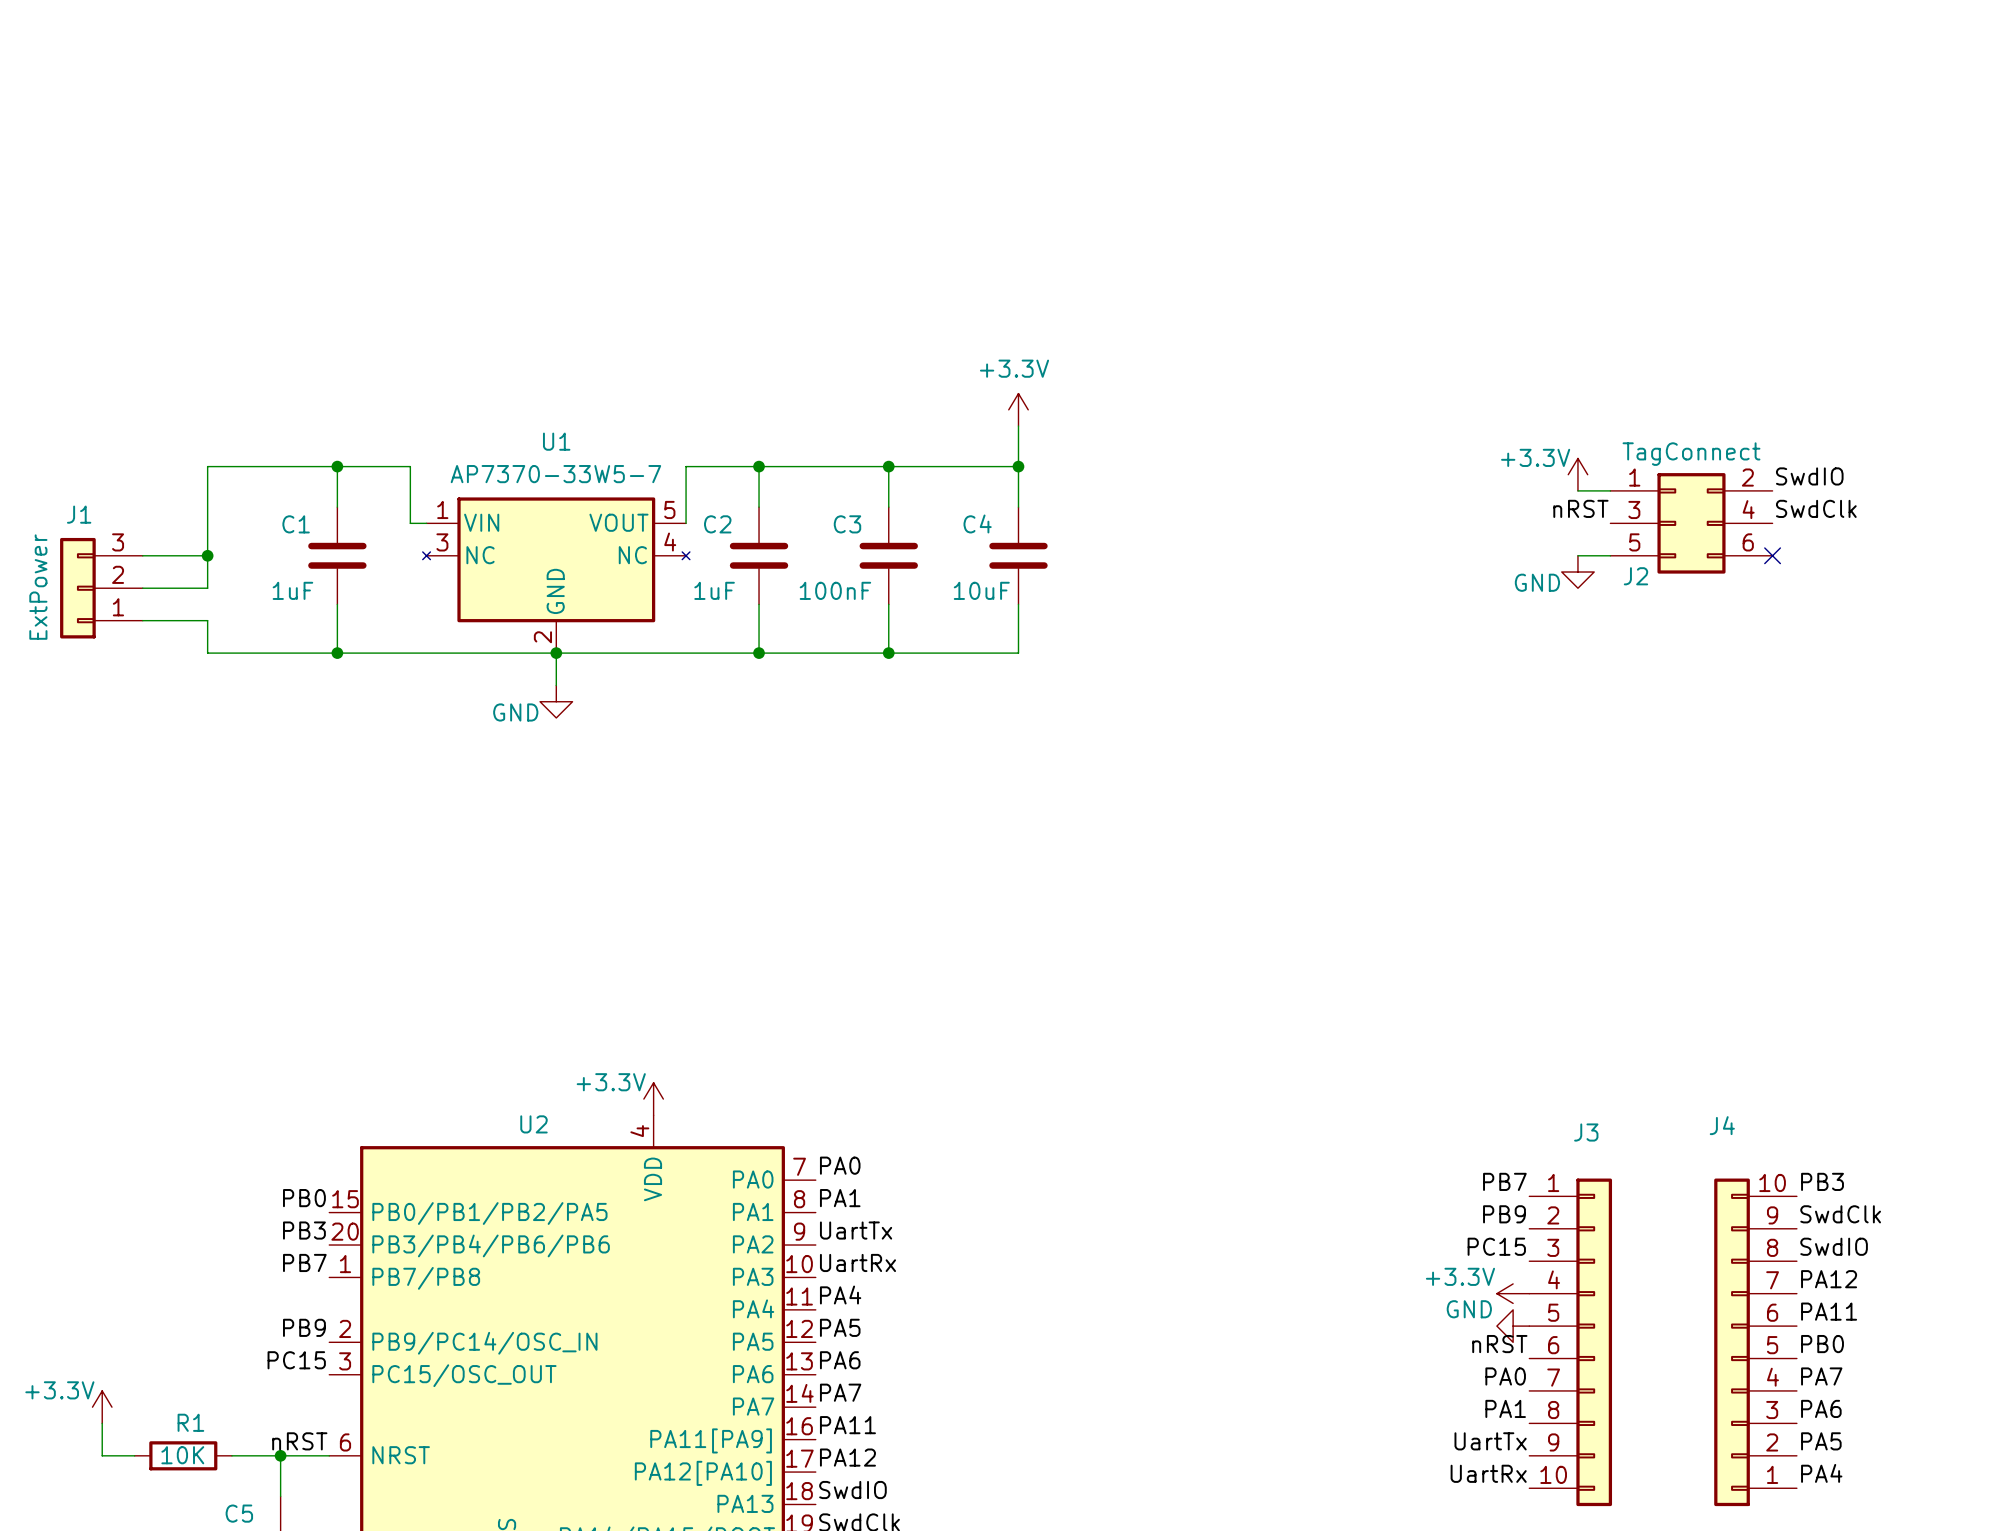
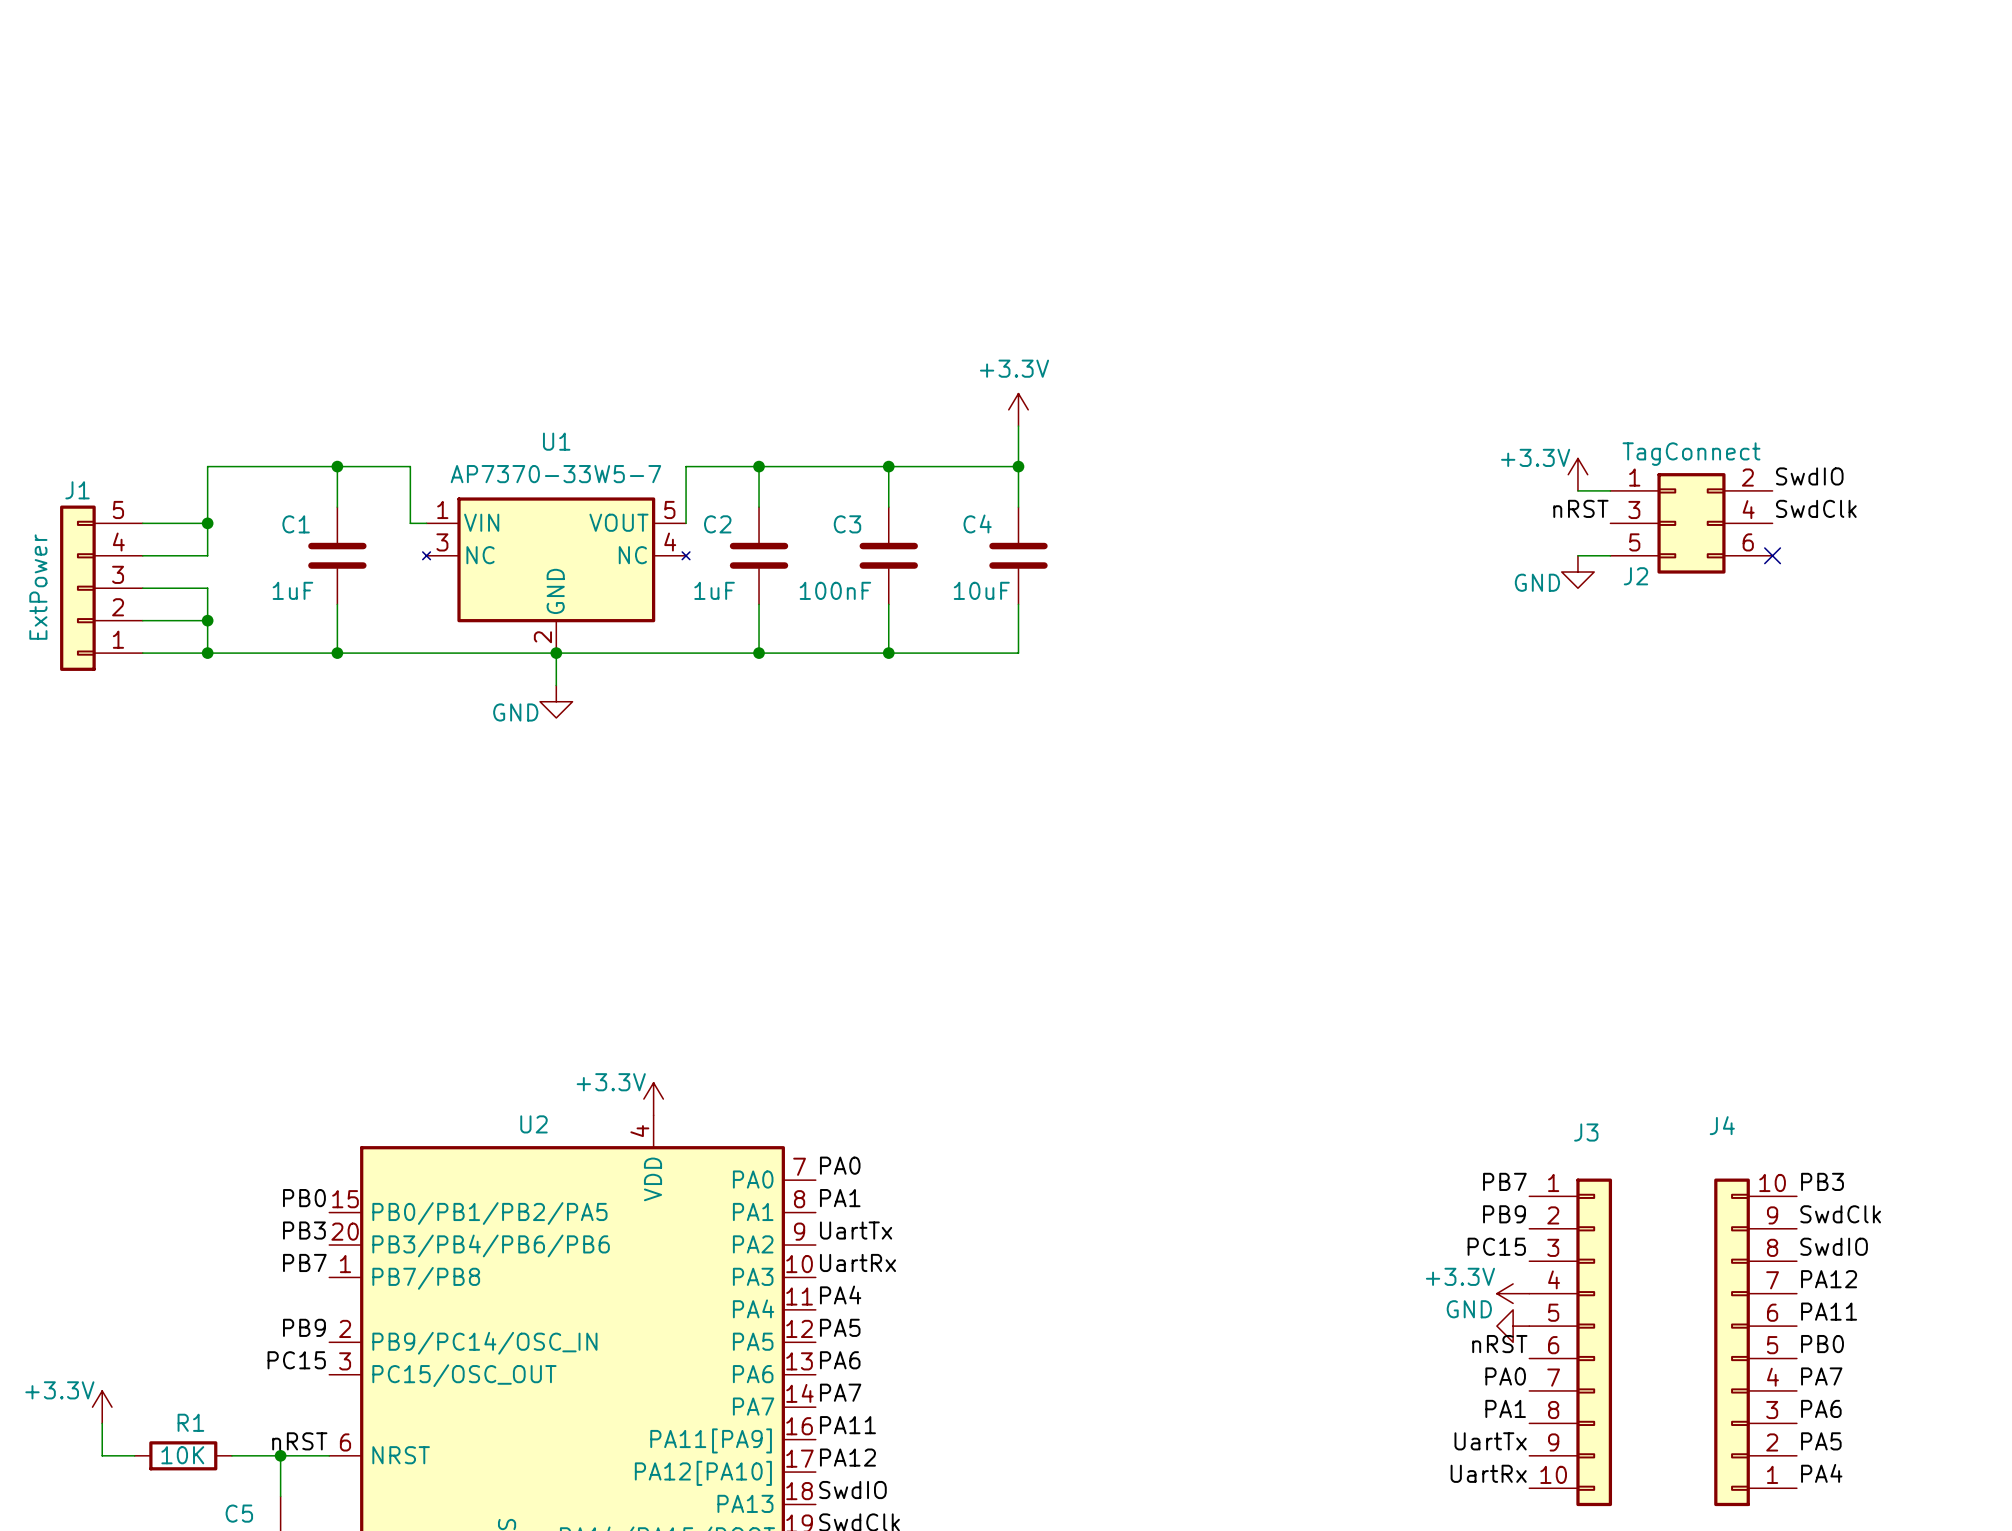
wire: none -> (142, 523) (207, 523)
junction: none -> (207, 523)
J1 symbol: [60, 537, 143, 639] -> [60, 505, 143, 671]
wire: (207, 555) (207, 588) -> (207, 620) (207, 588)
junction: (207, 555) -> none
junction: none -> (207, 620)
wire: none -> (142, 653) (207, 653)
junction: none -> (207, 653)

